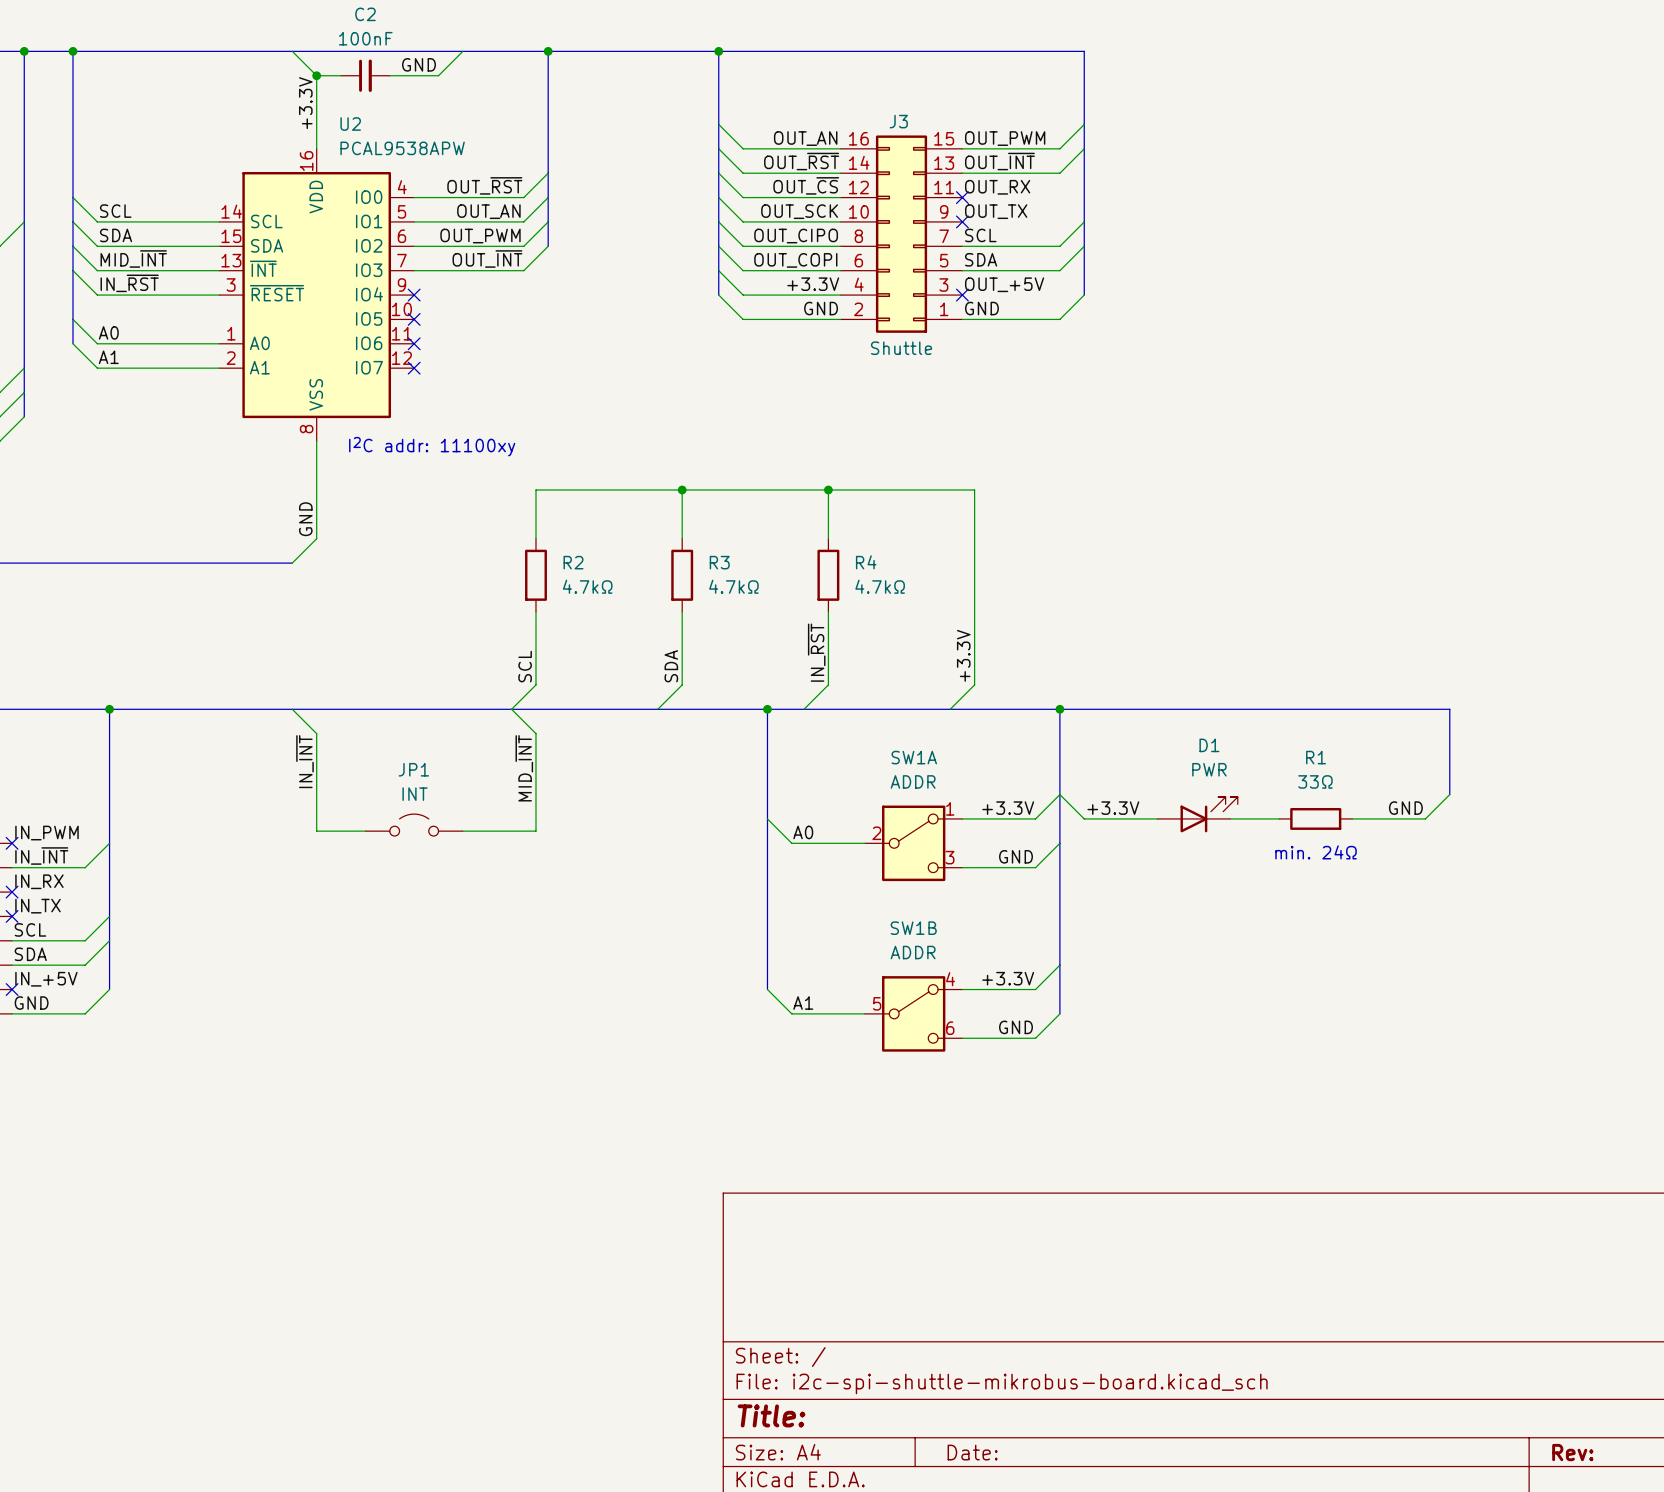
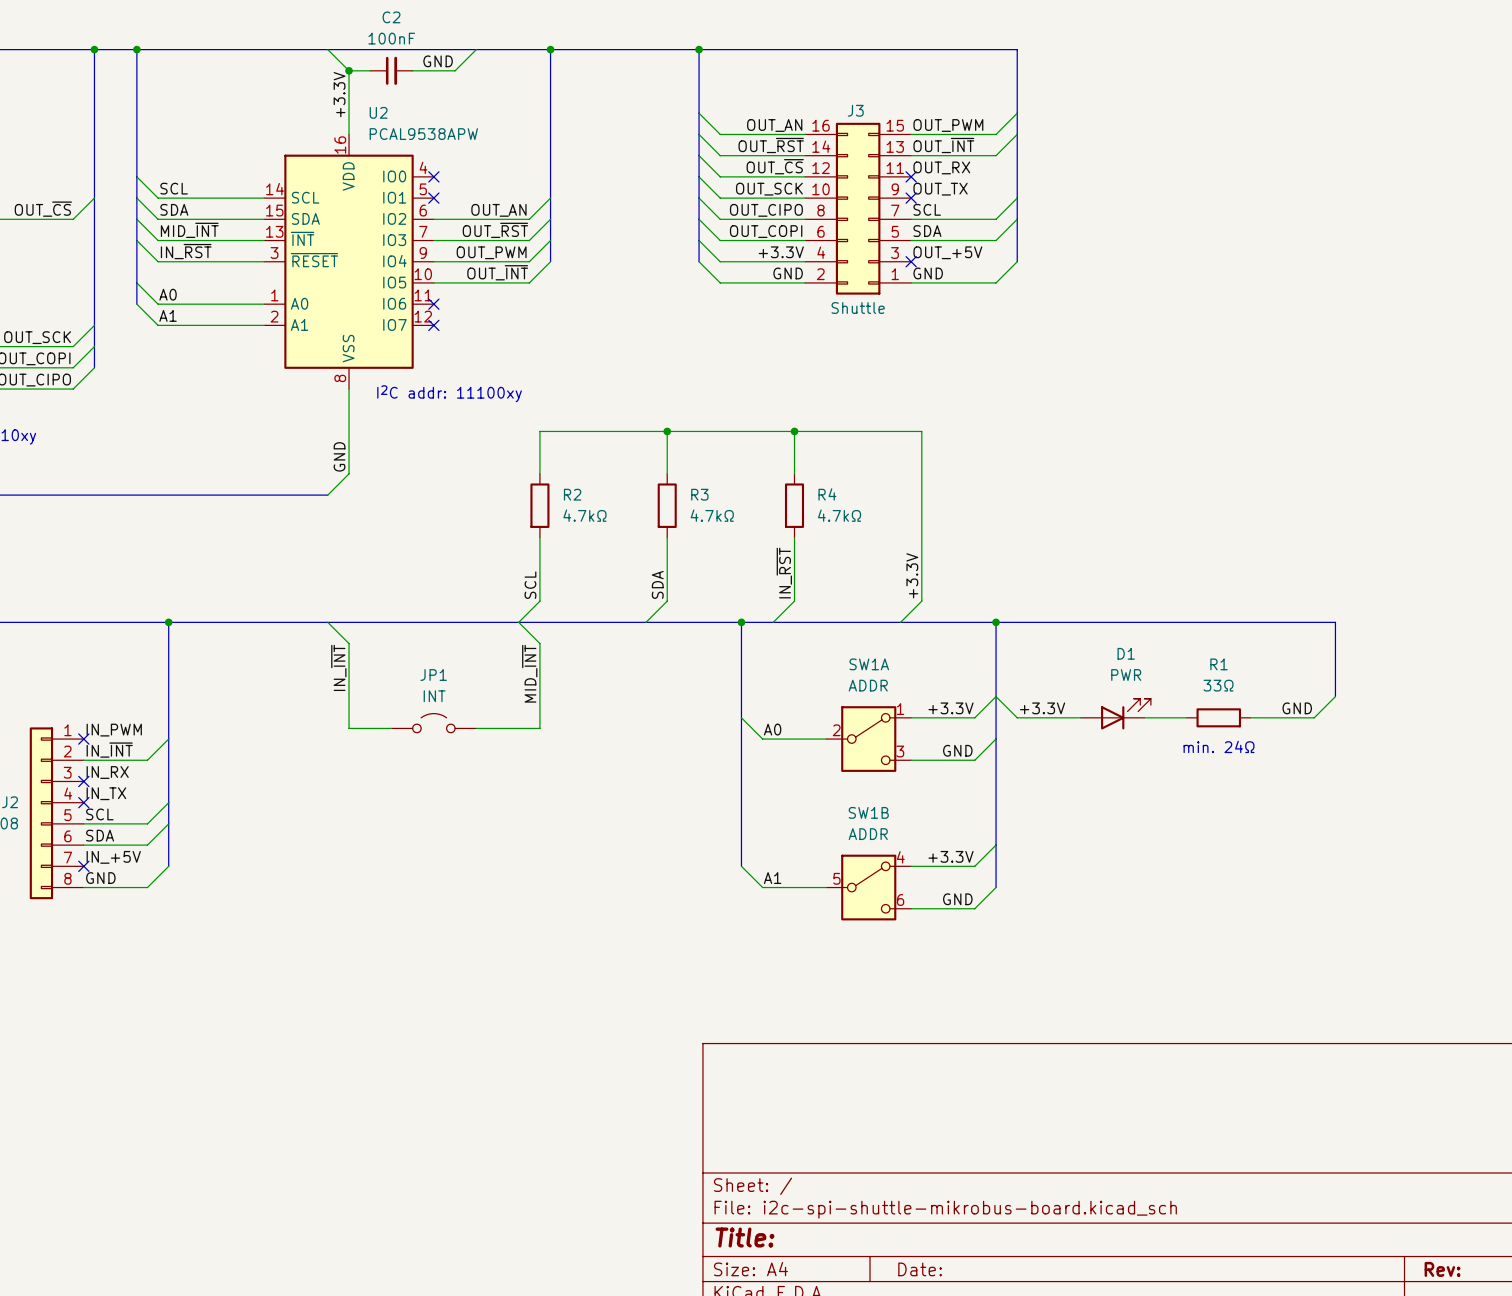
wire: (548, 173) (523, 197) (414, 197) -> (550, 240) (529, 261) (433, 261)
label: OUT_~{RST} (484, 185) -> none
no-connect mark: none -> (433, 176)
wire: (548, 197) (523, 221) (414, 221) -> (550, 261) (529, 282) (433, 282)
label: OUT_AN (488, 211) -> none
no-connect mark: none -> (433, 198)
label: OUT_PWM (480, 236) -> OUT_AN (498, 210)
bus: none -> (550, 219) (550, 261)
label: OUT_~{INT} (487, 258) -> OUT_~{RST} (495, 230)
label: none -> OUT_PWM (491, 252)
no-connect mark: (414, 295) -> none
label: none -> OUT_~{INT} (497, 272)
no-connect mark: (414, 319) -> none

